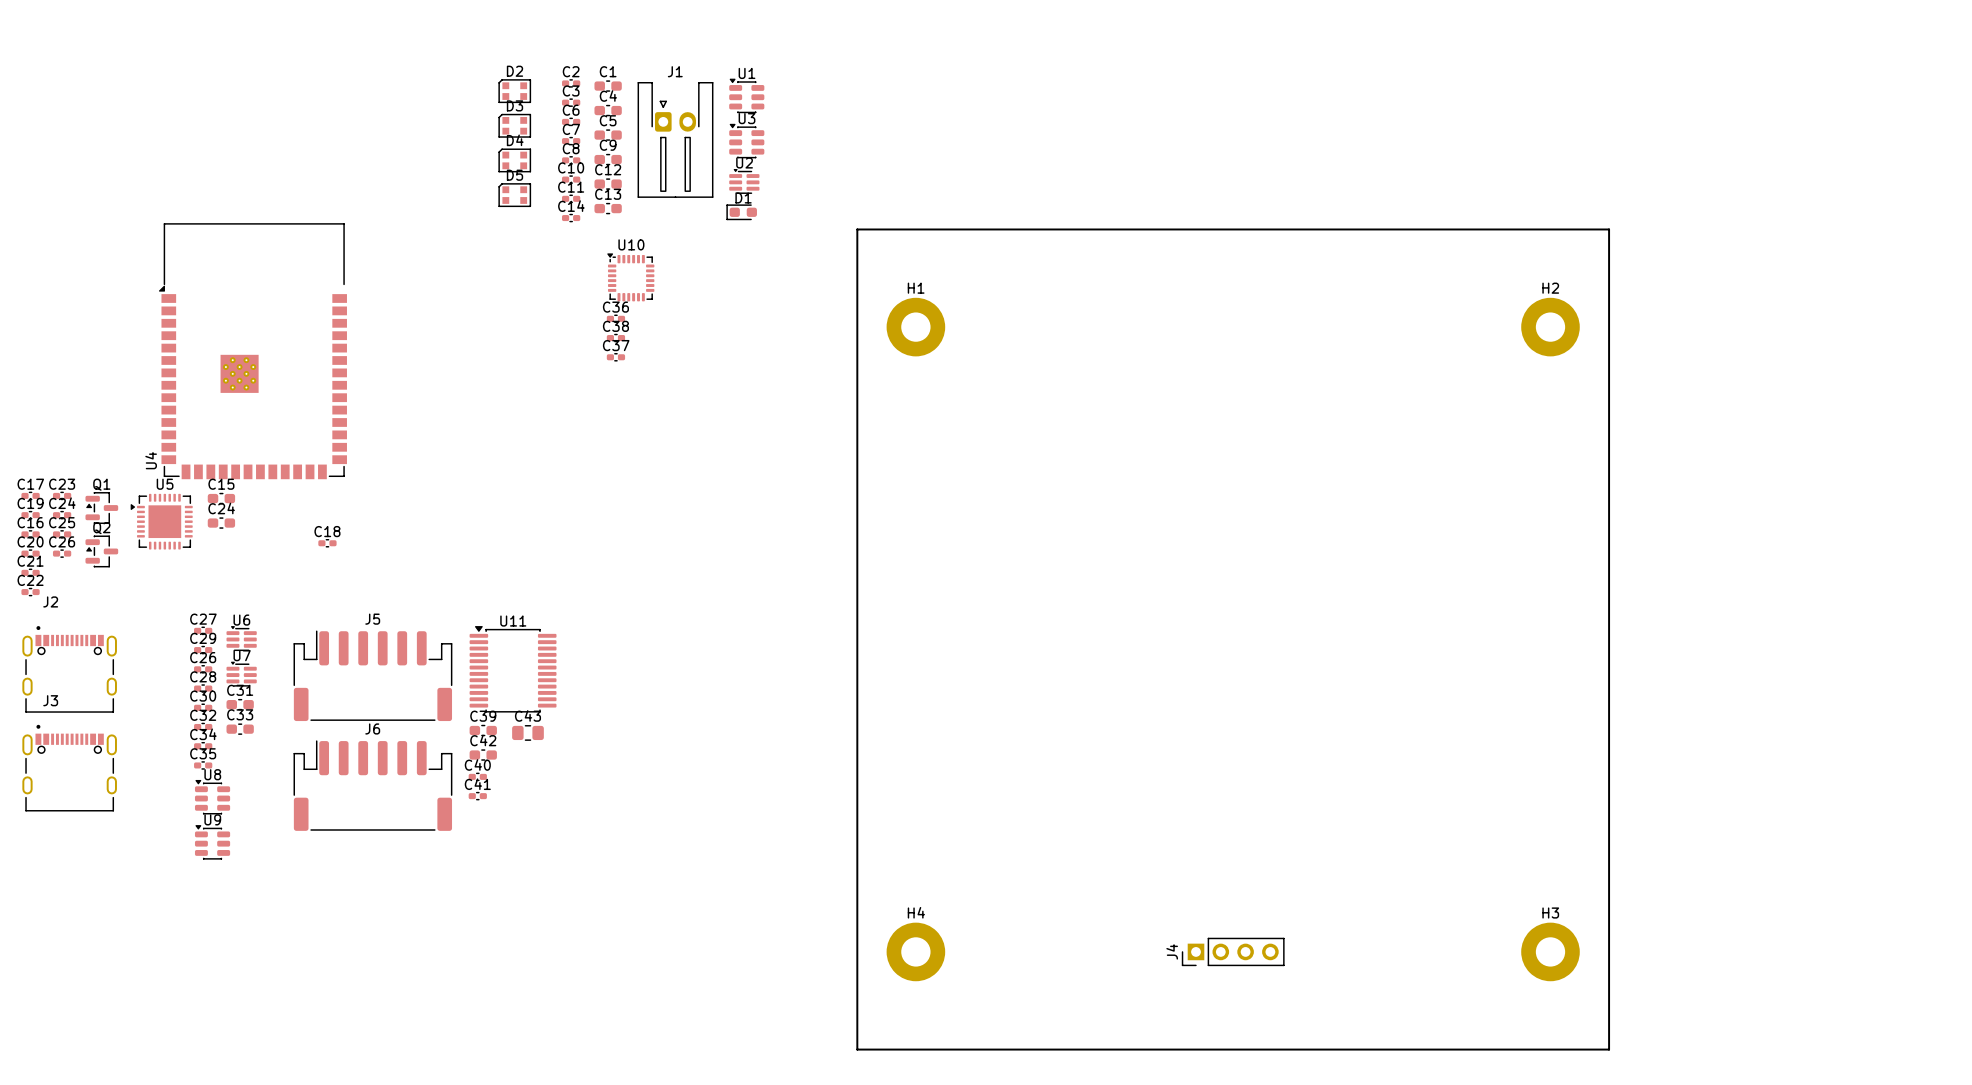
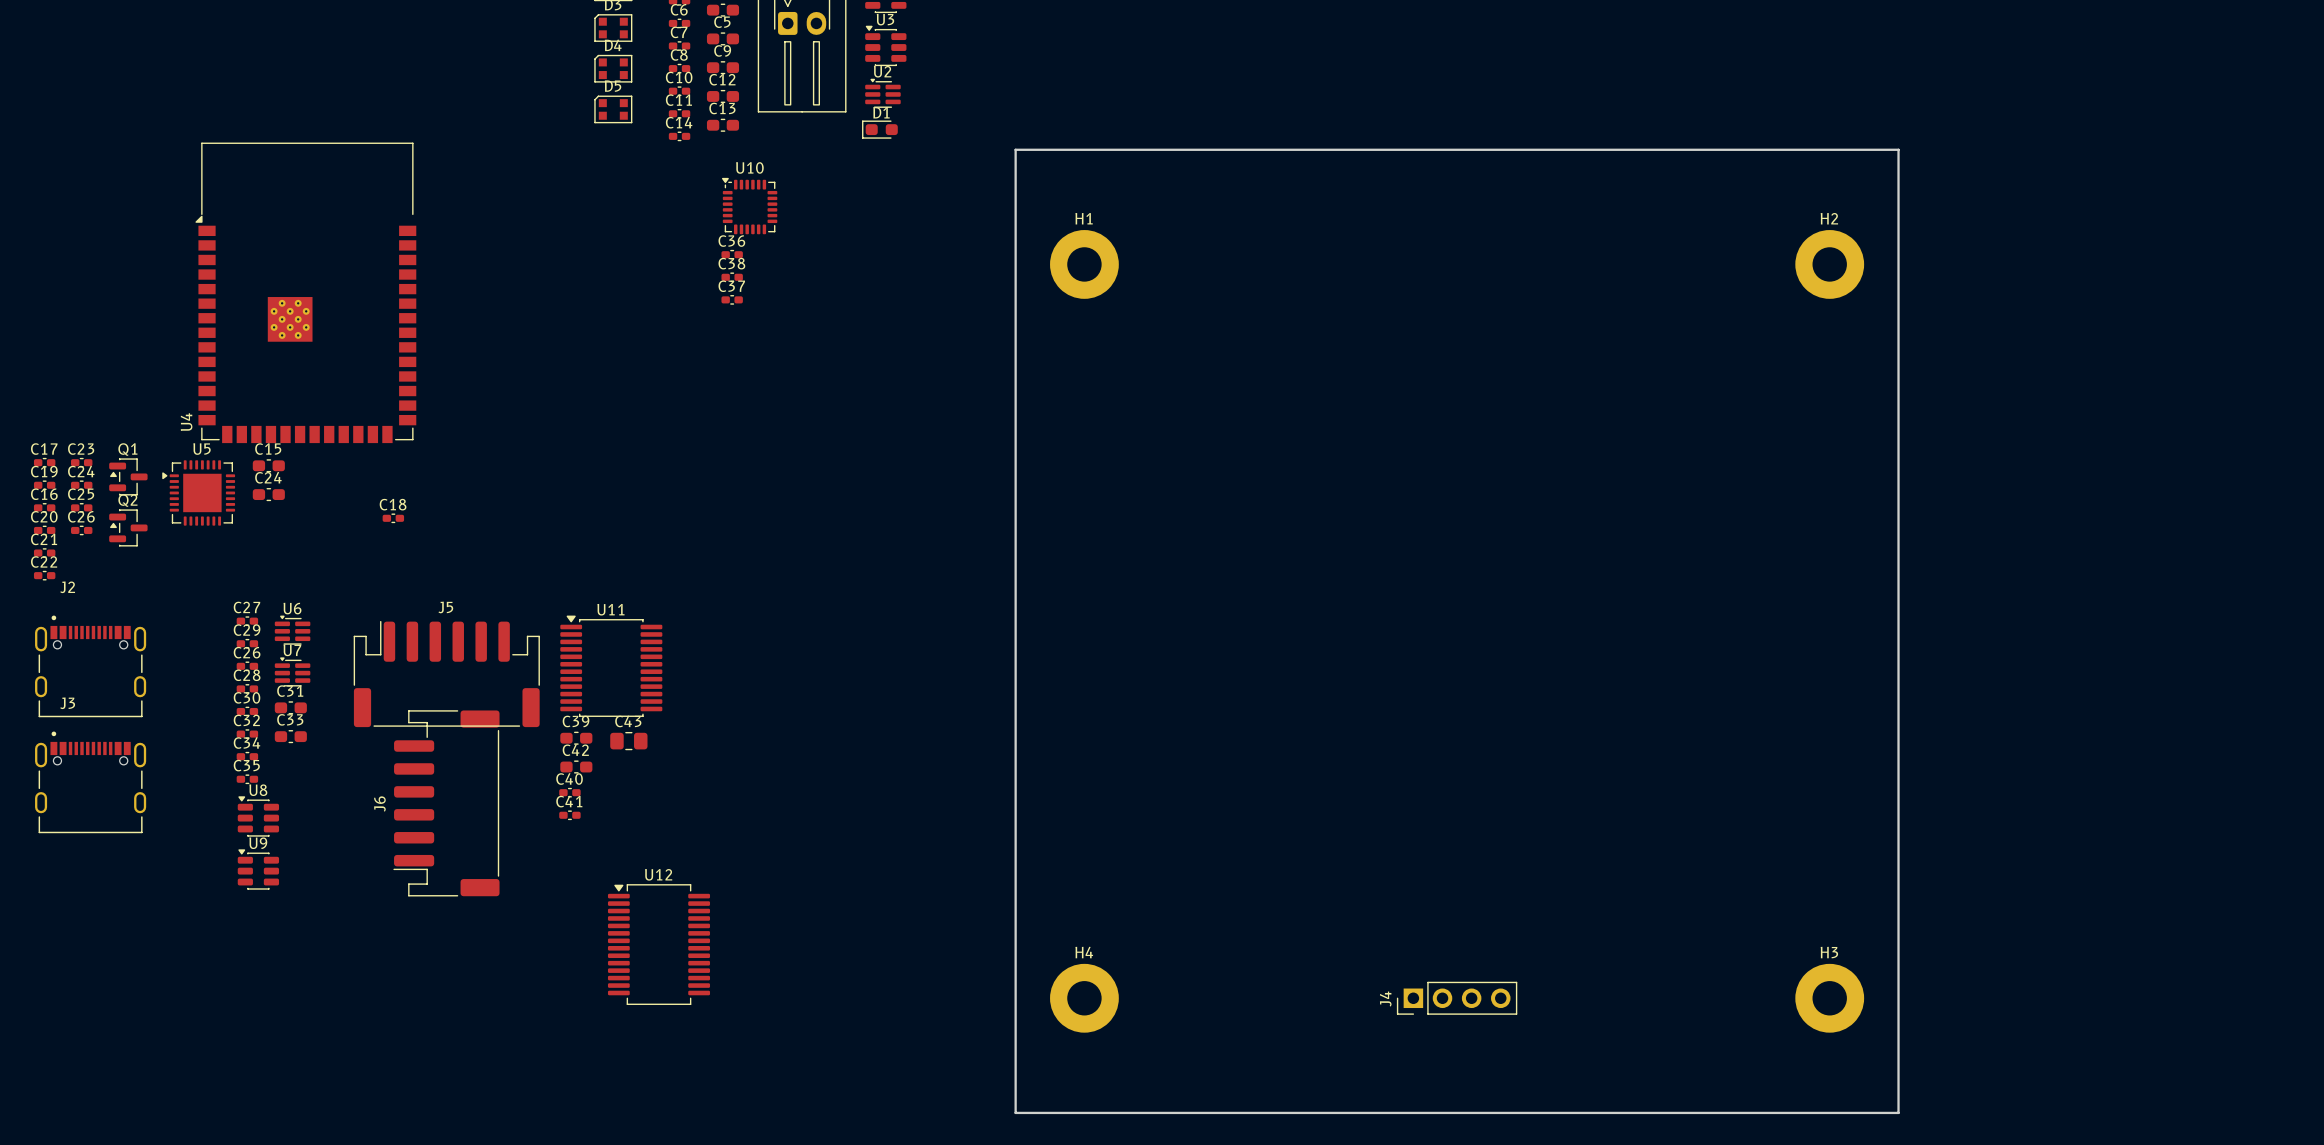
J6 rotation: 0° (372, 785) -> 90° counterclockwise (446, 803)
U12: none -> (658, 944)

